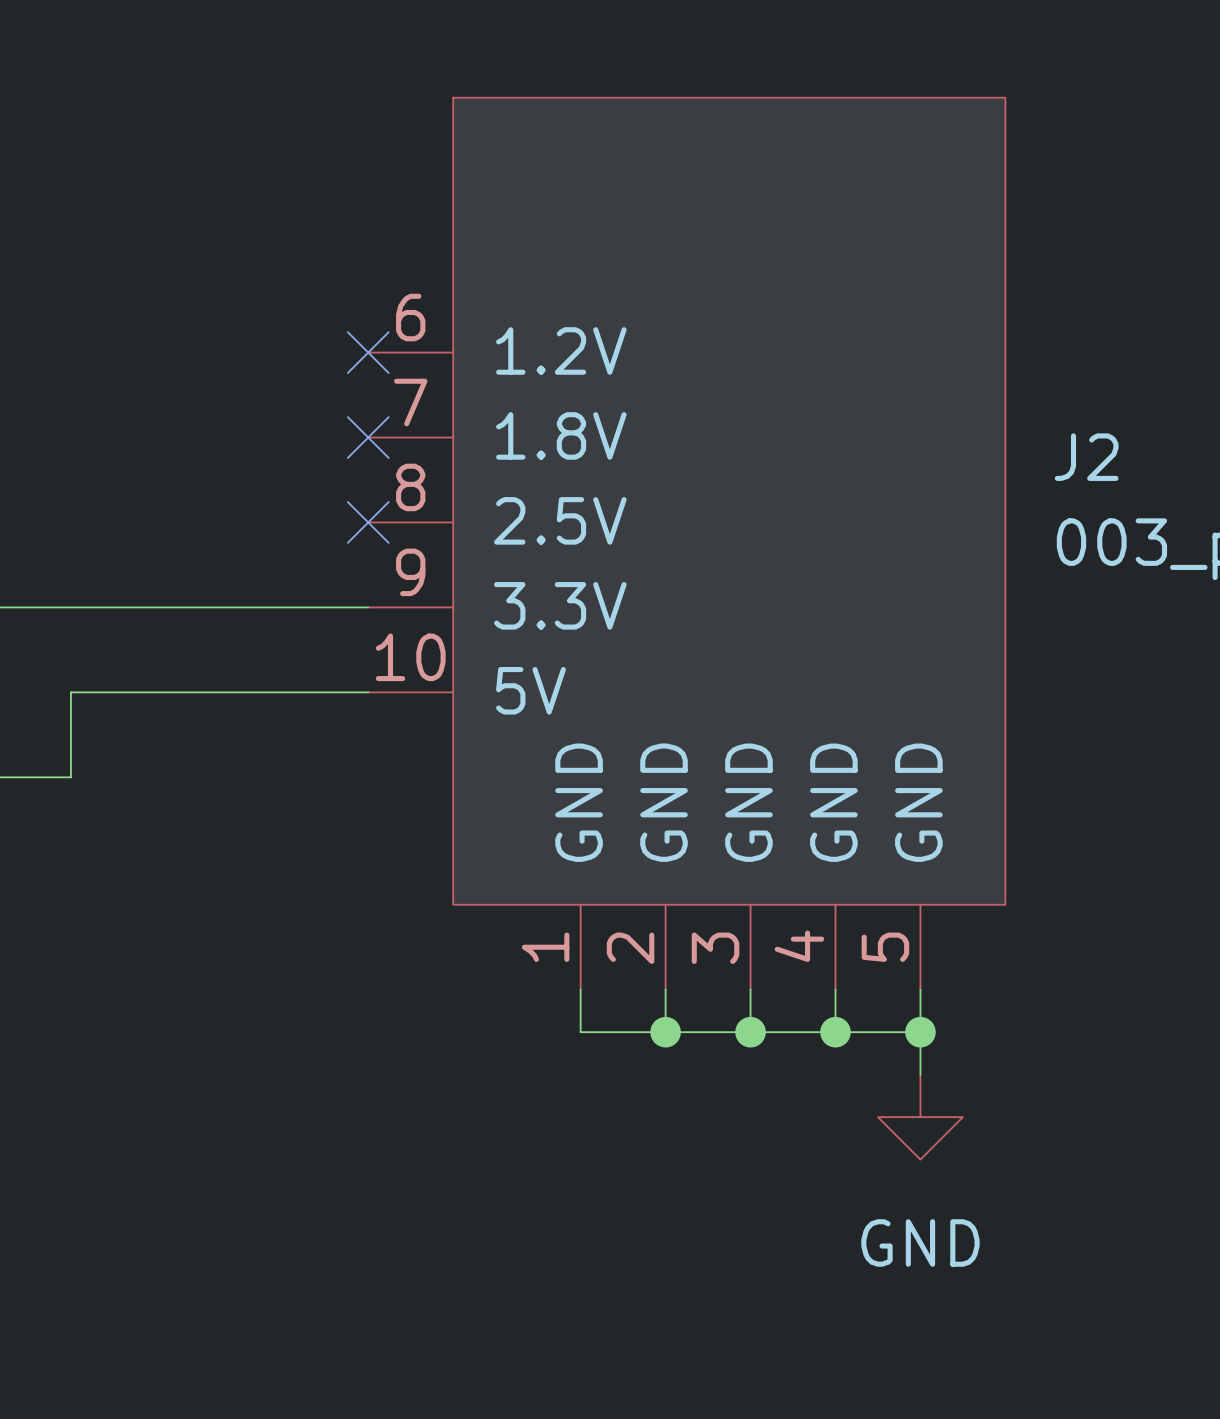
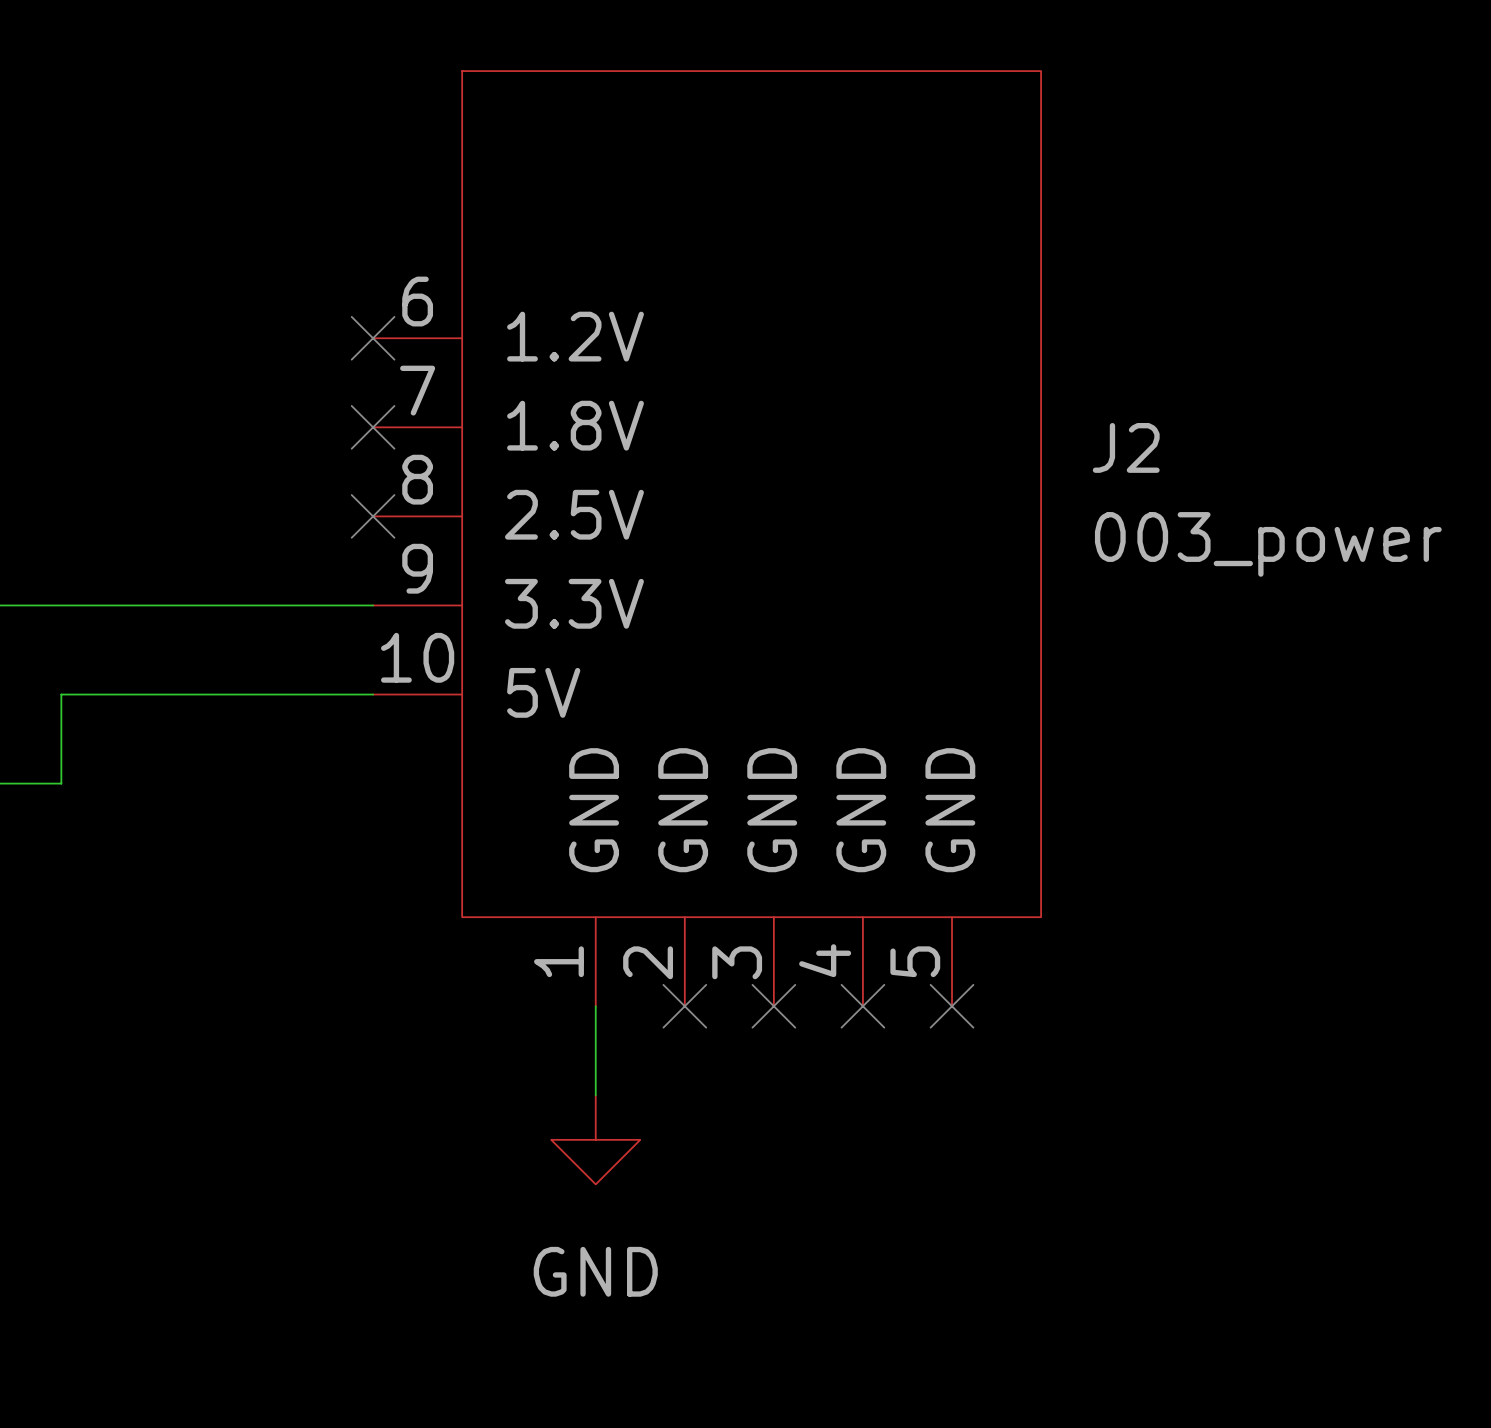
wire: (665, 989) (665, 1032) -> none
no-connect mark: none -> (684, 1006)
wire: (750, 989) (750, 1032) -> none
no-connect mark: none -> (773, 1006)
wire: (835, 989) (835, 1032) -> none
no-connect mark: none -> (862, 1006)
wire: (920, 989) (920, 1074) -> none
no-connect mark: none -> (952, 1006)
wire: (580, 1032) (920, 1032) -> (595, 1050) (595, 1095)
junction: (665, 1032) -> none
junction: (750, 1032) -> none
junction: (835, 1032) -> none
junction: (920, 1032) -> none
power symbol position: GND (920, 1117) -> GND (595, 1139)

